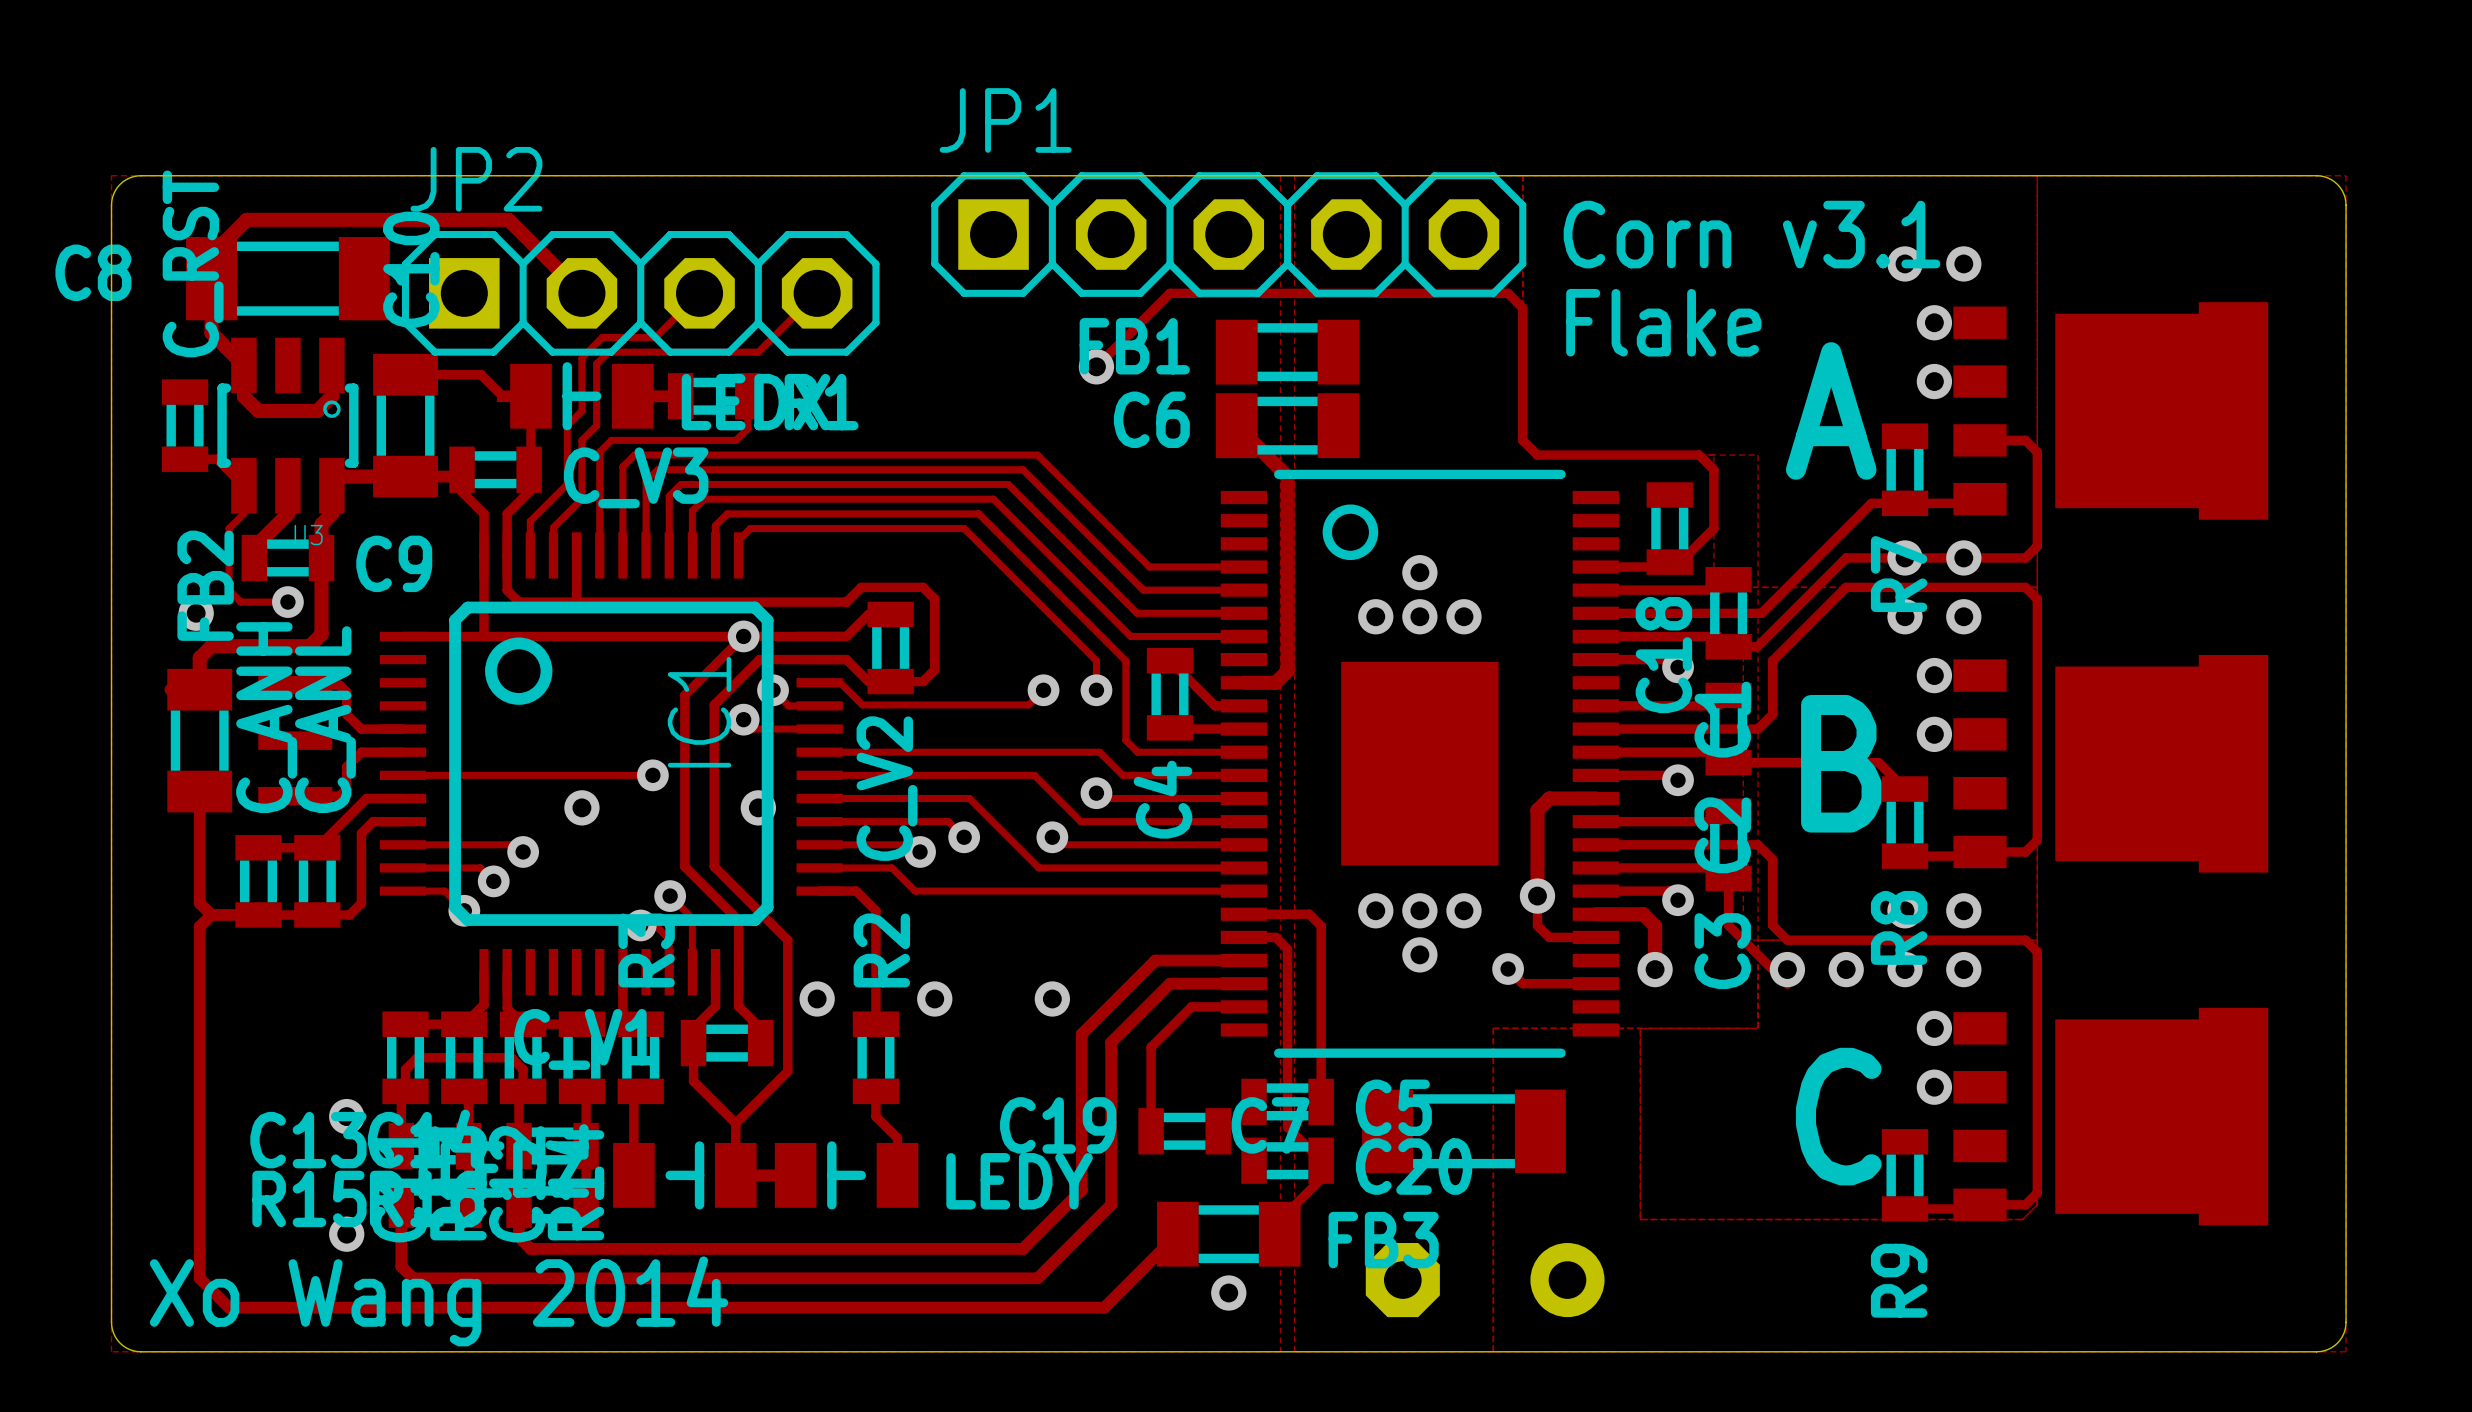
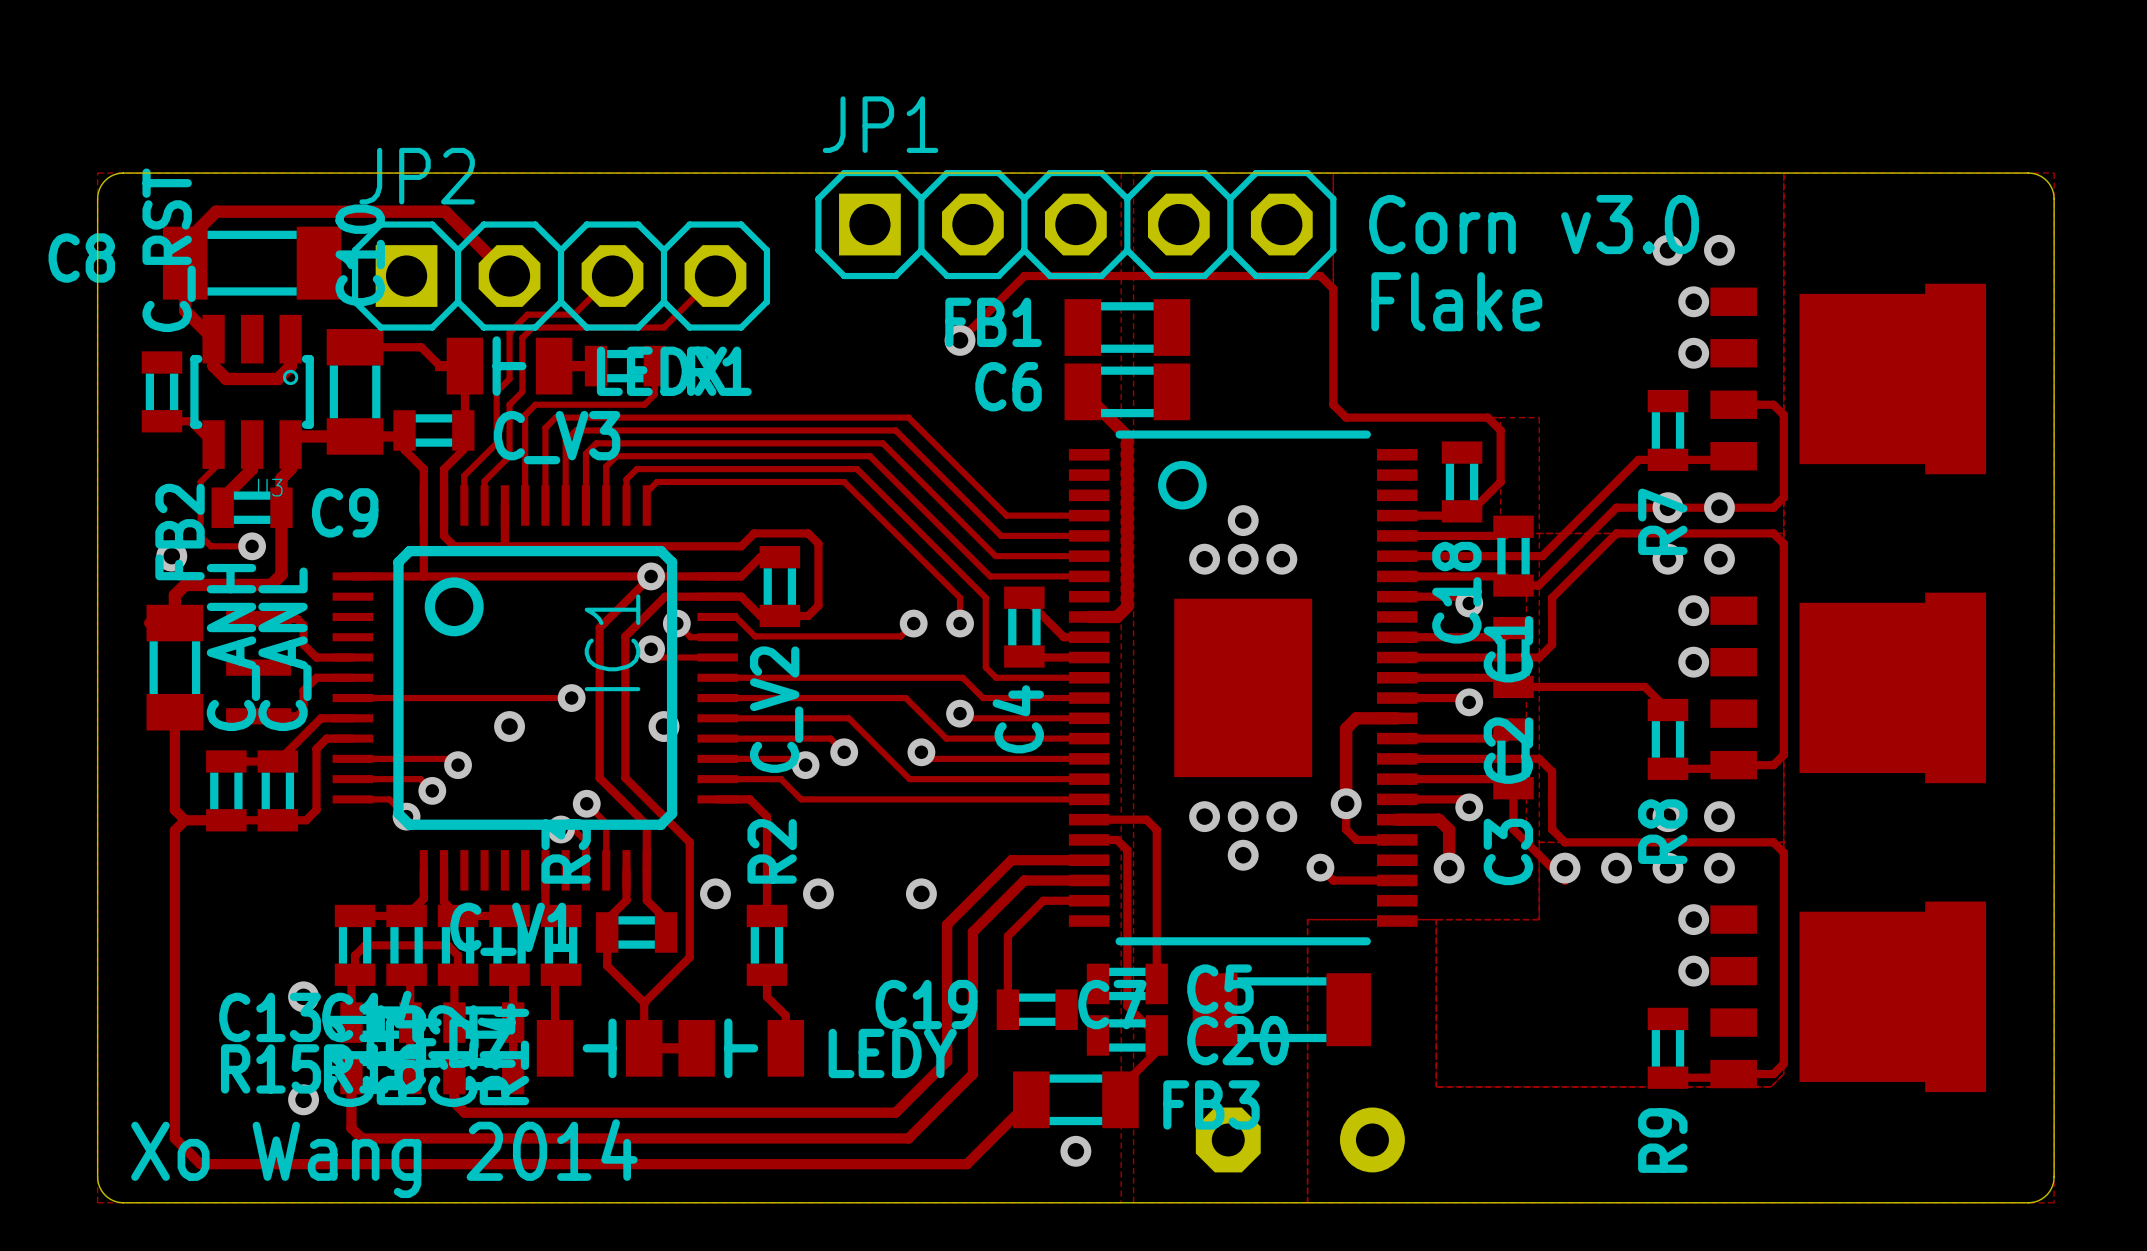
text: Corn v3.1 (1752, 234) -> Corn v3.0 (1534, 224)
text: A (1831, 410) -> none
text: B (1841, 763) -> none
text: C (1838, 1116) -> none

